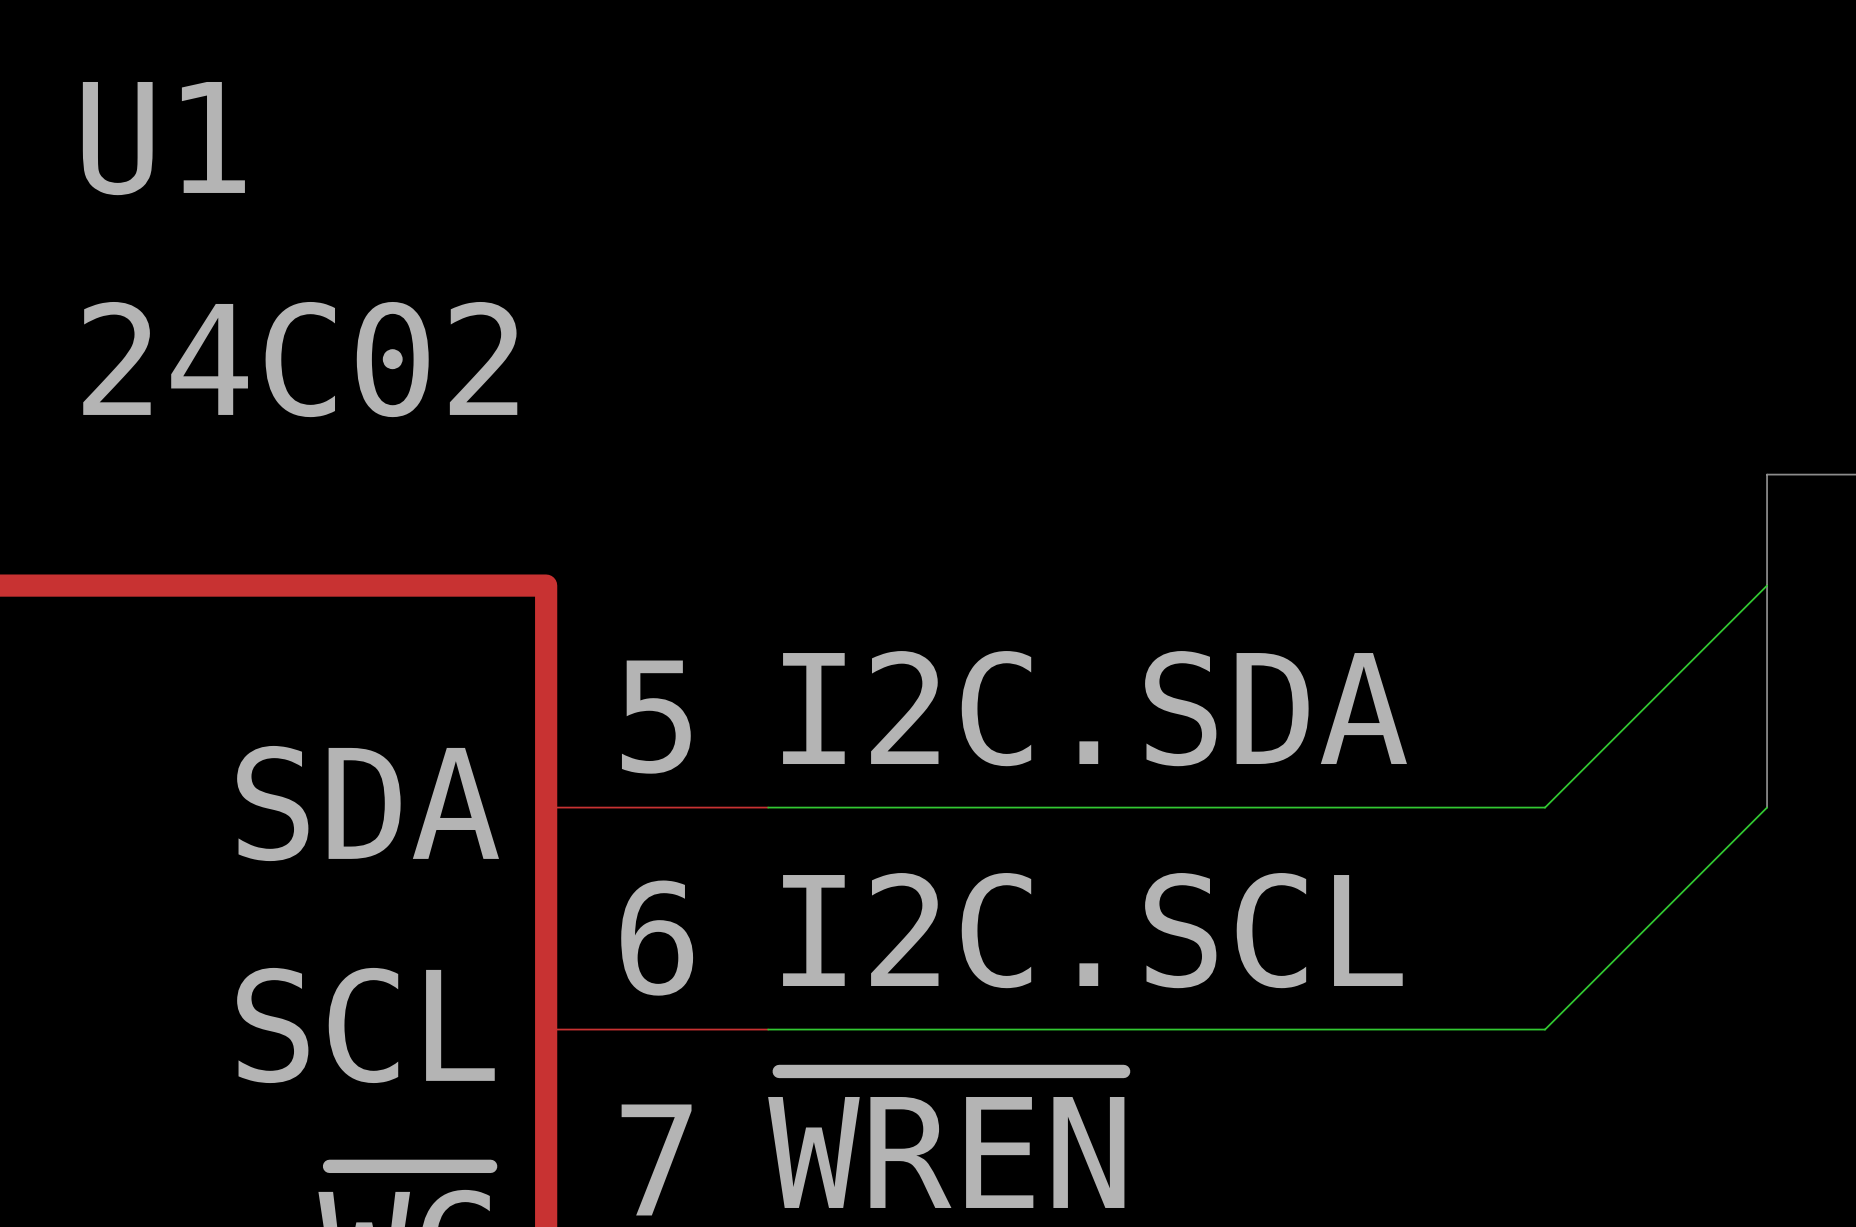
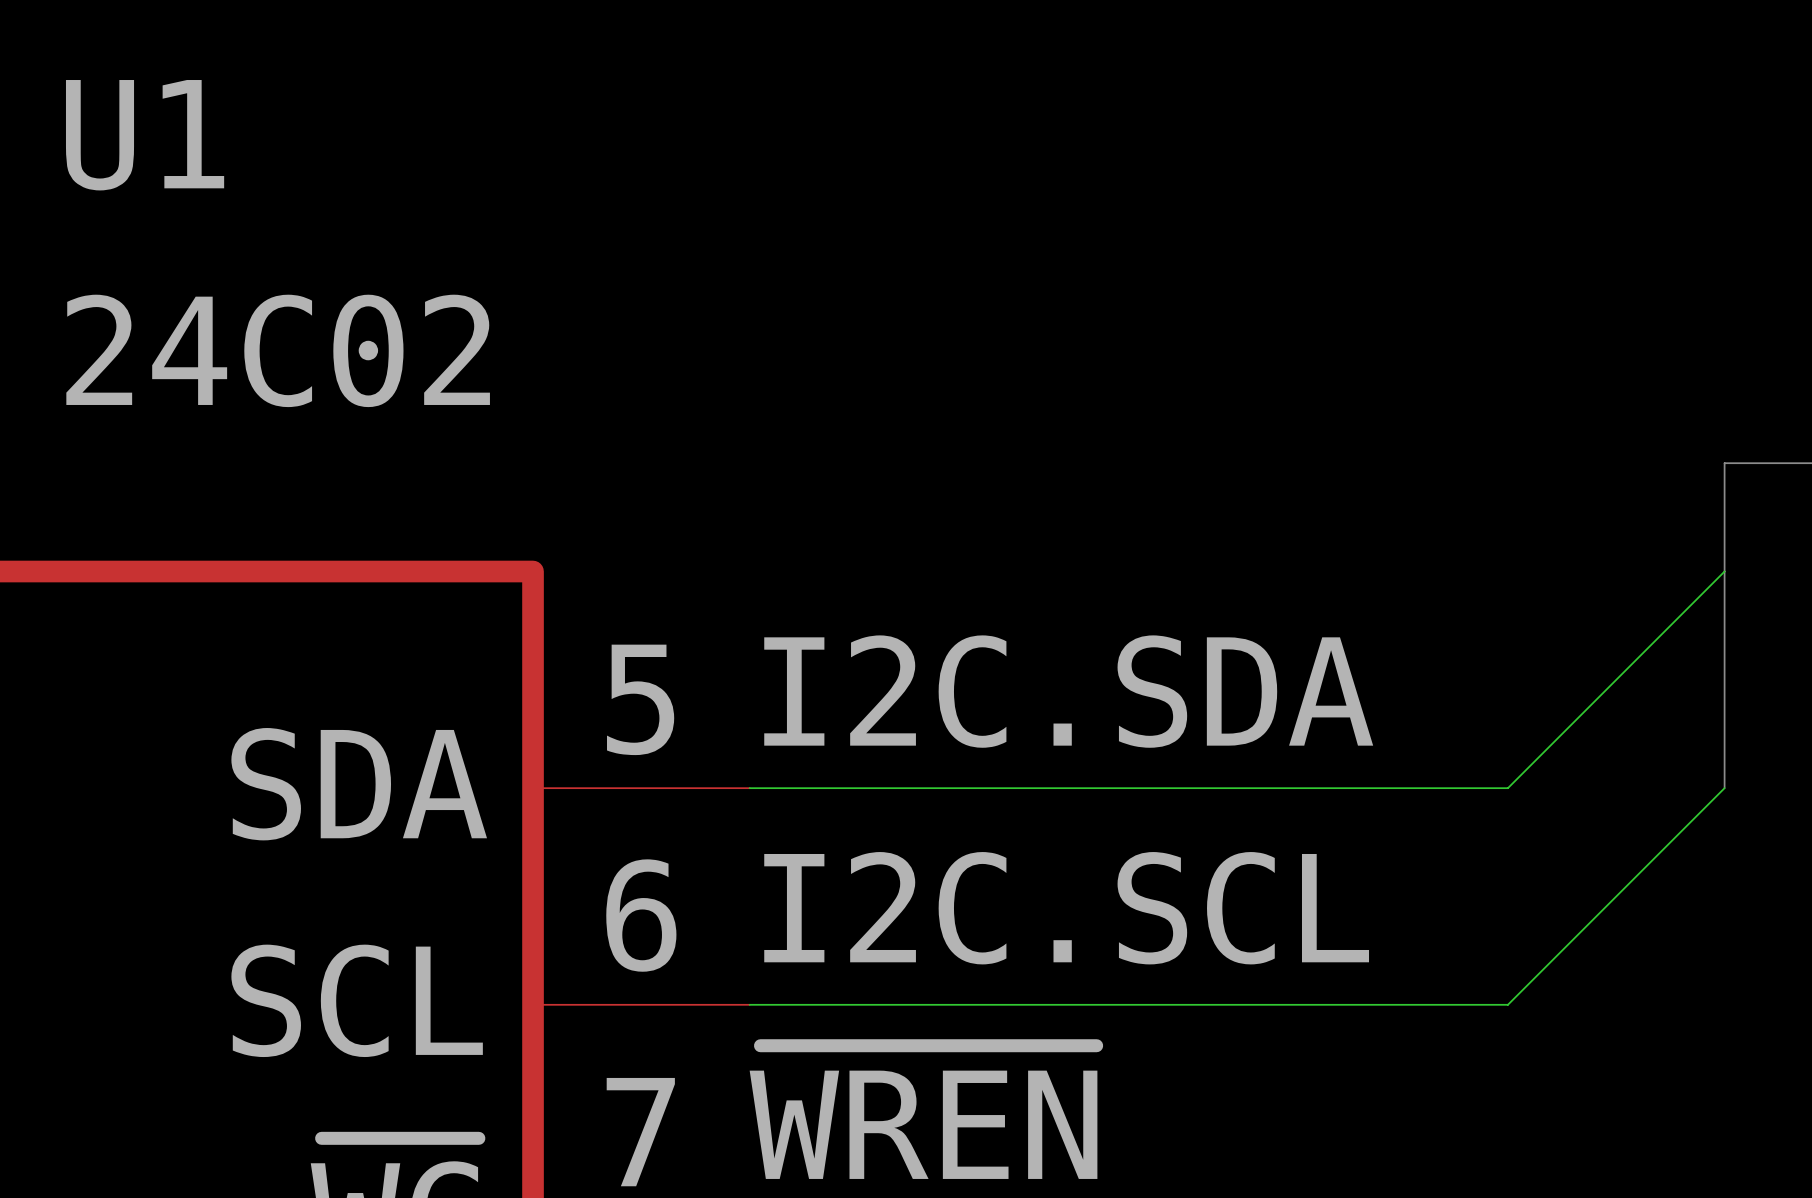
U1 name position: U1 (163, 138) -> U1 (145, 135)
U1 value position: 24C02 (300, 359) -> 24C02 (278, 350)

